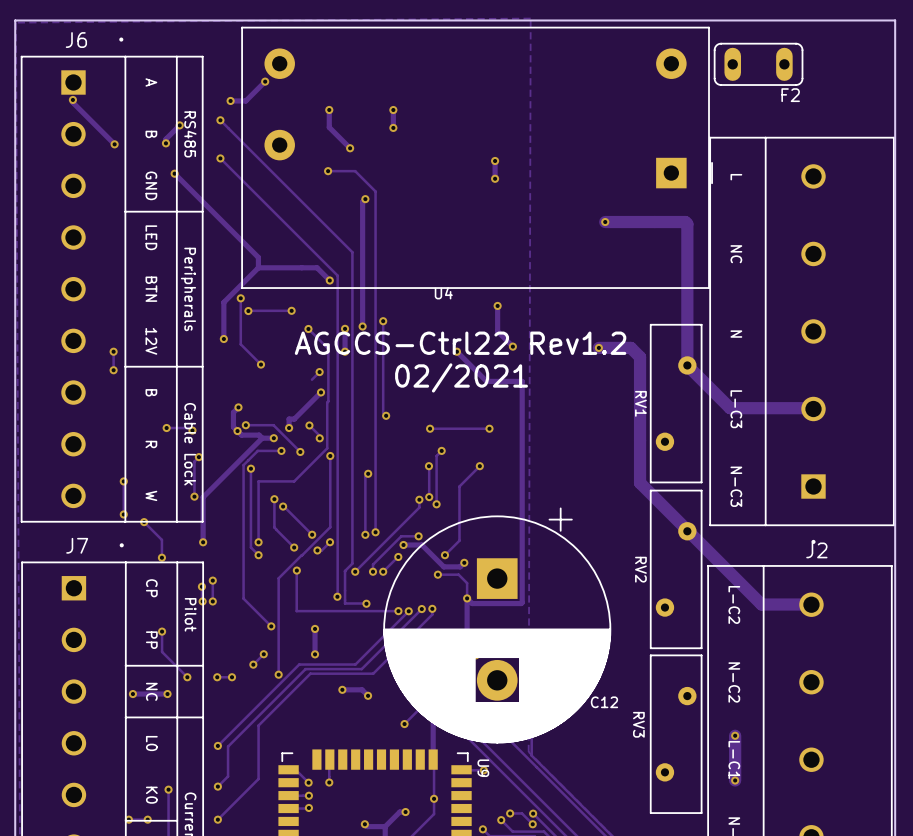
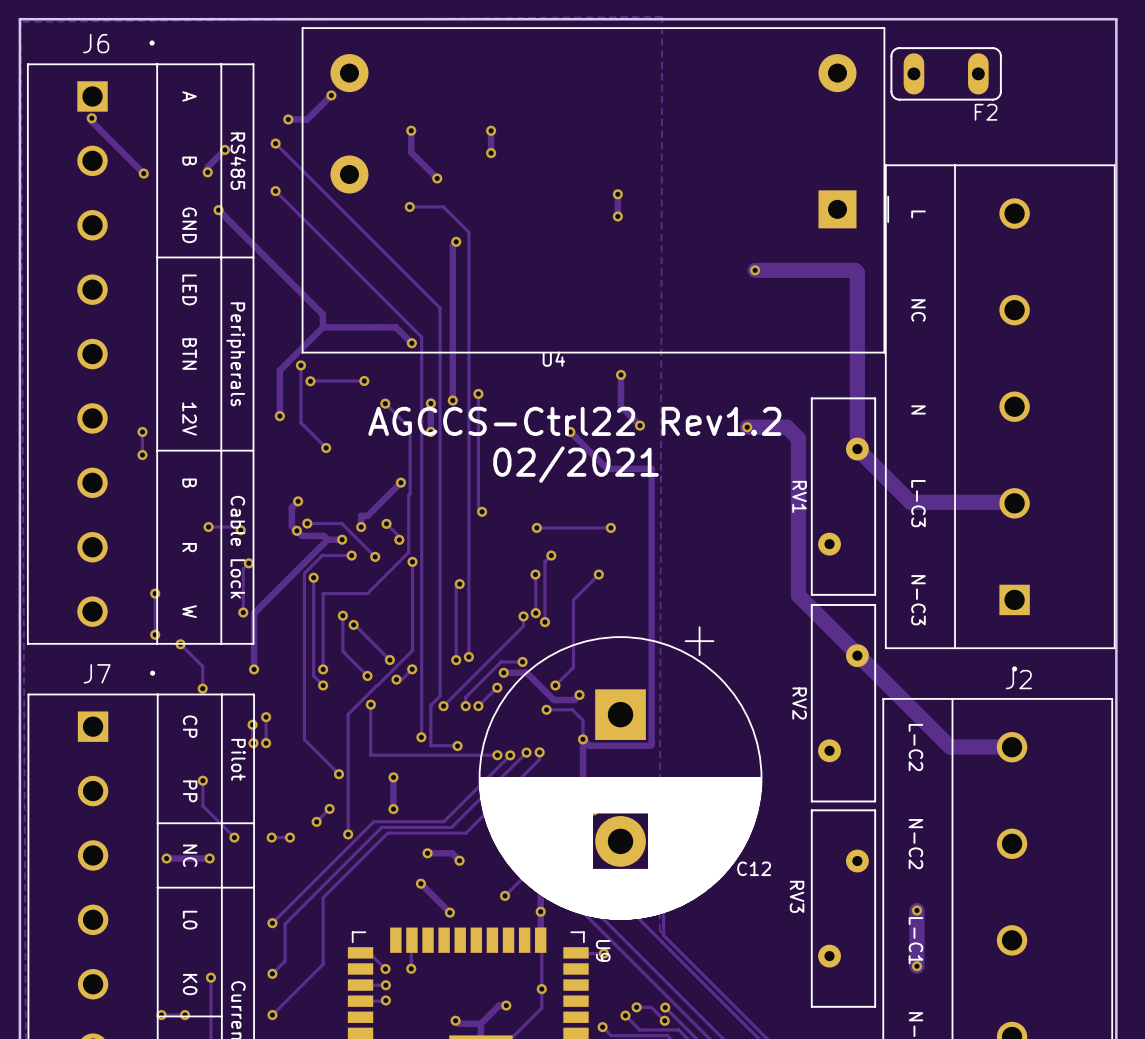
track: (319, 372) (311, 379) -> none
via: (319, 372) -> none
track: none -> (420, 883) (449, 912)
via: none -> (420, 883)
via: none -> (540, 911)
via: none -> (449, 912)

